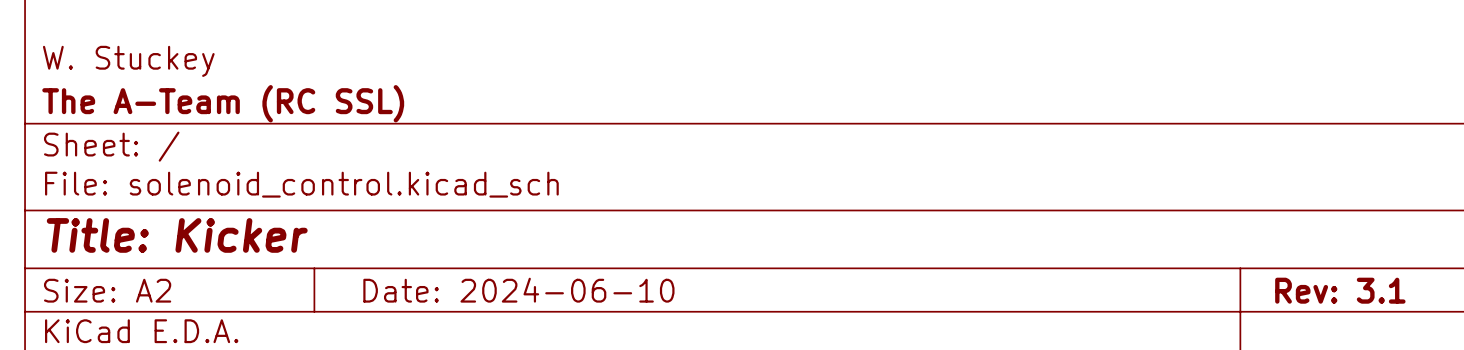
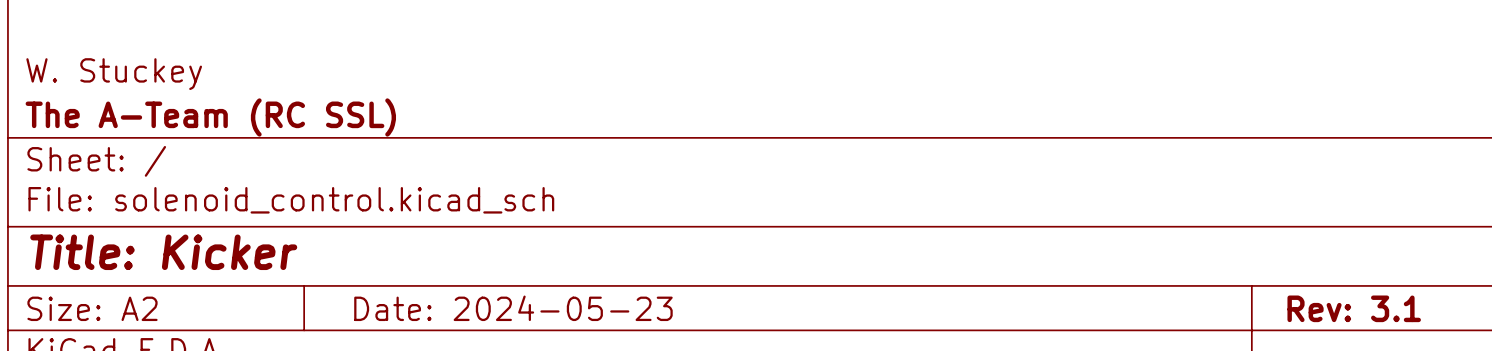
title block: Date: 2024-06-10 (518, 290) -> Date: 2024-05-23 (513, 308)

